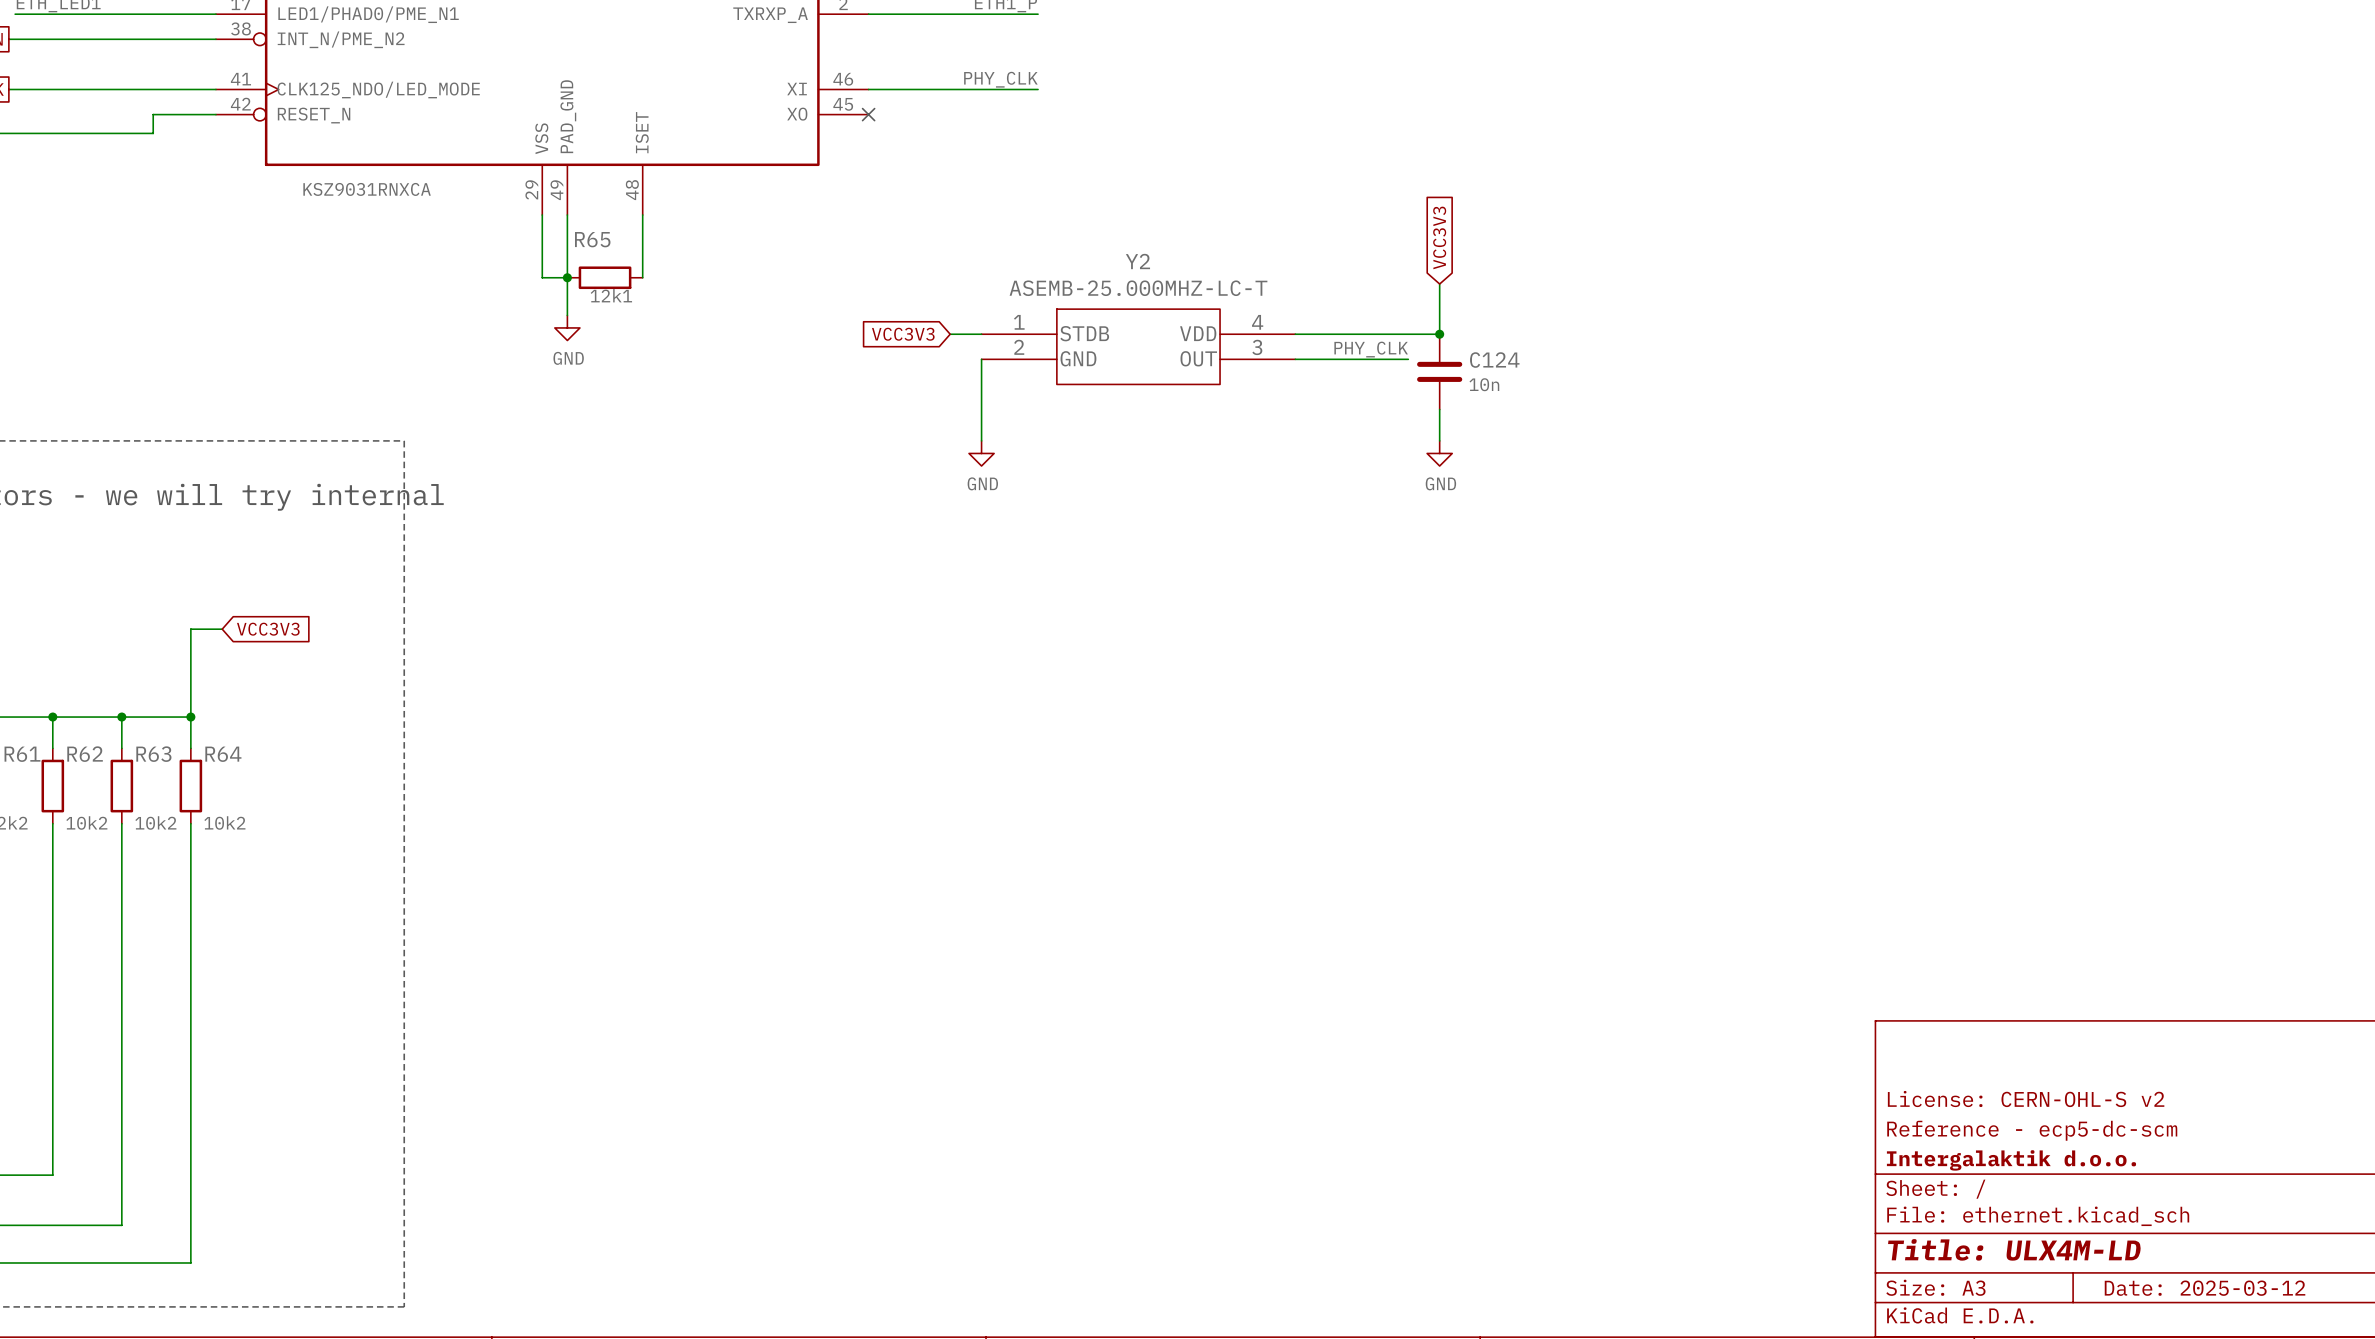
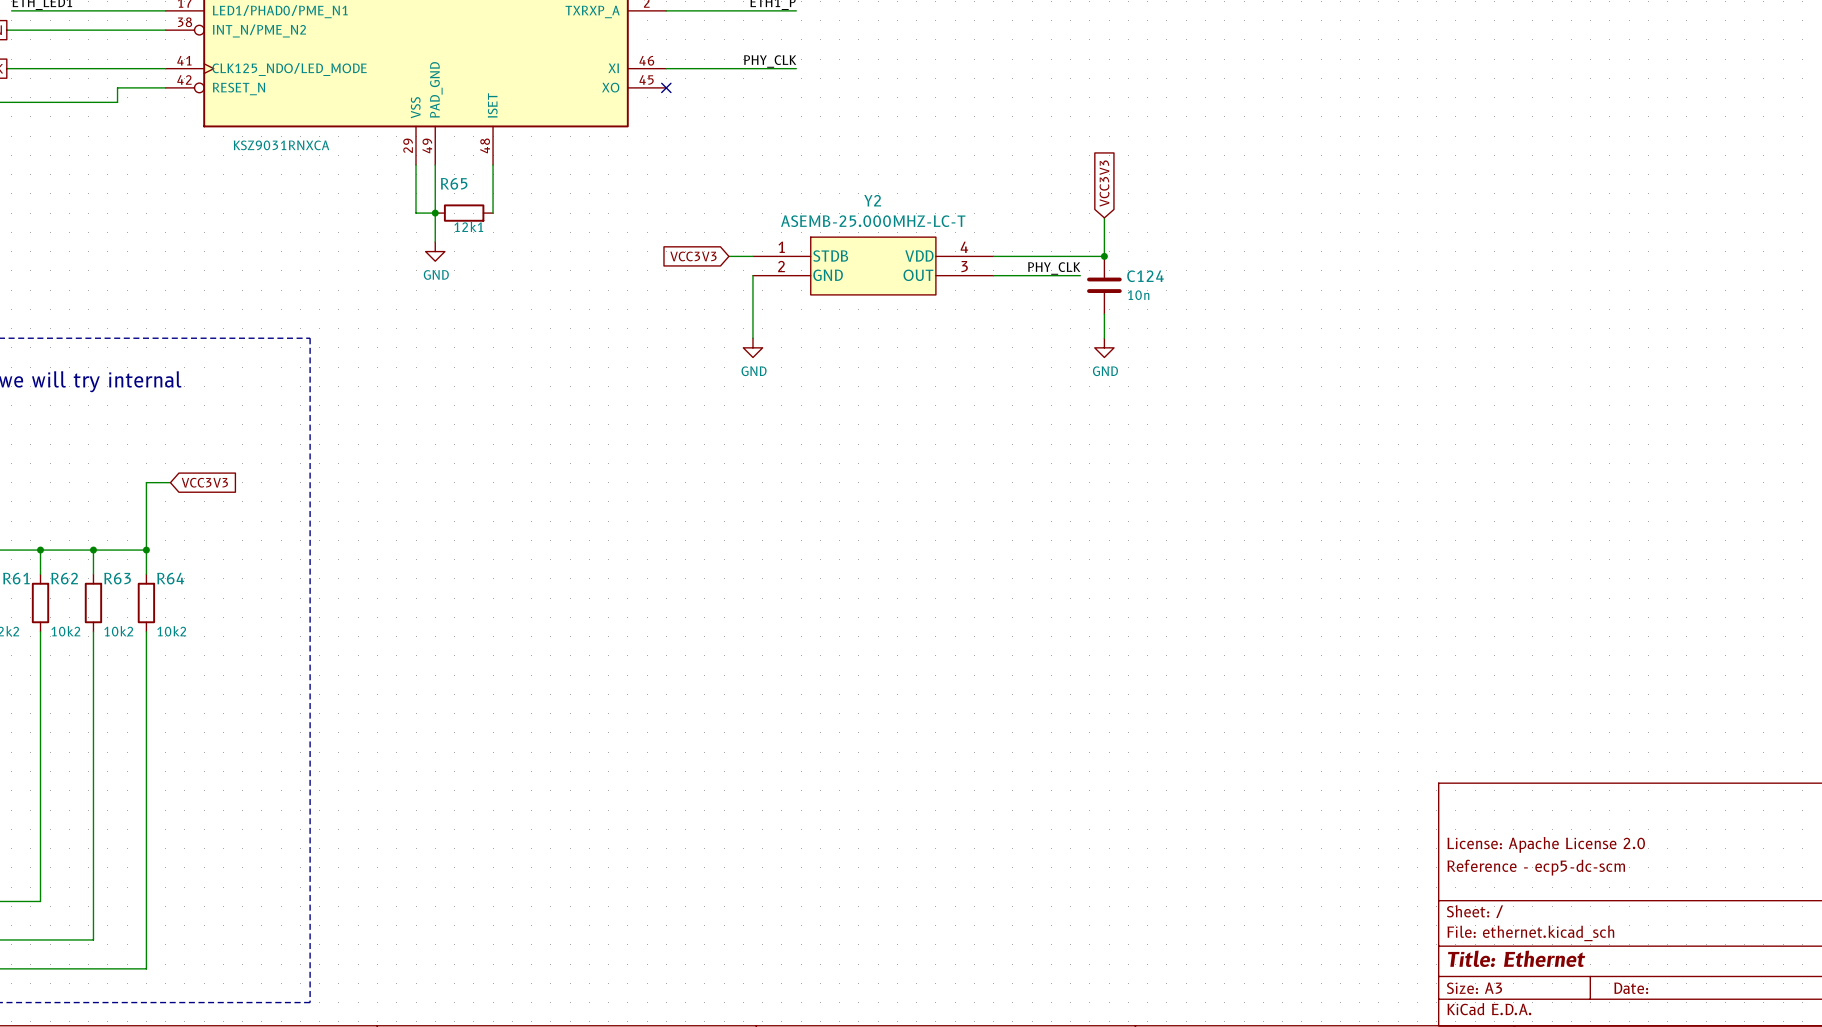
title block: License: CERN-OHL-S v2 (2026, 1099) -> License: Apache License 2.0 (1546, 844)
title block: Intergalaktik d.o.o. (2011, 1160) -> none
title block: Title: ULX4M-LD (2014, 1249) -> Title: Ethernet (1516, 958)
title block: Date: 2025-03-12 (2205, 1288) -> Date: (1631, 988)

